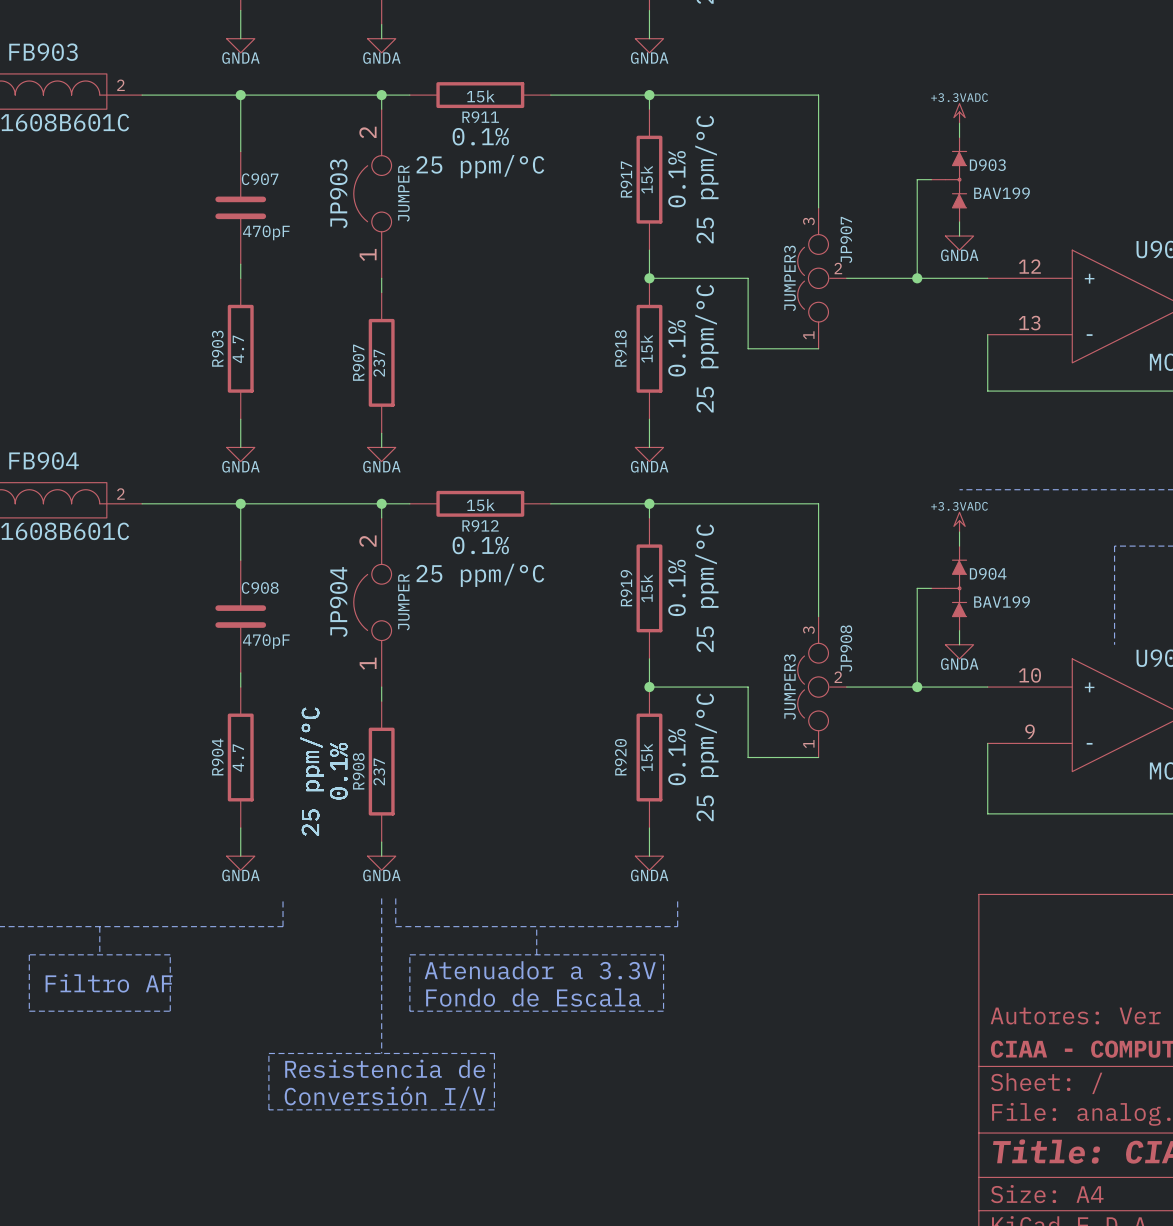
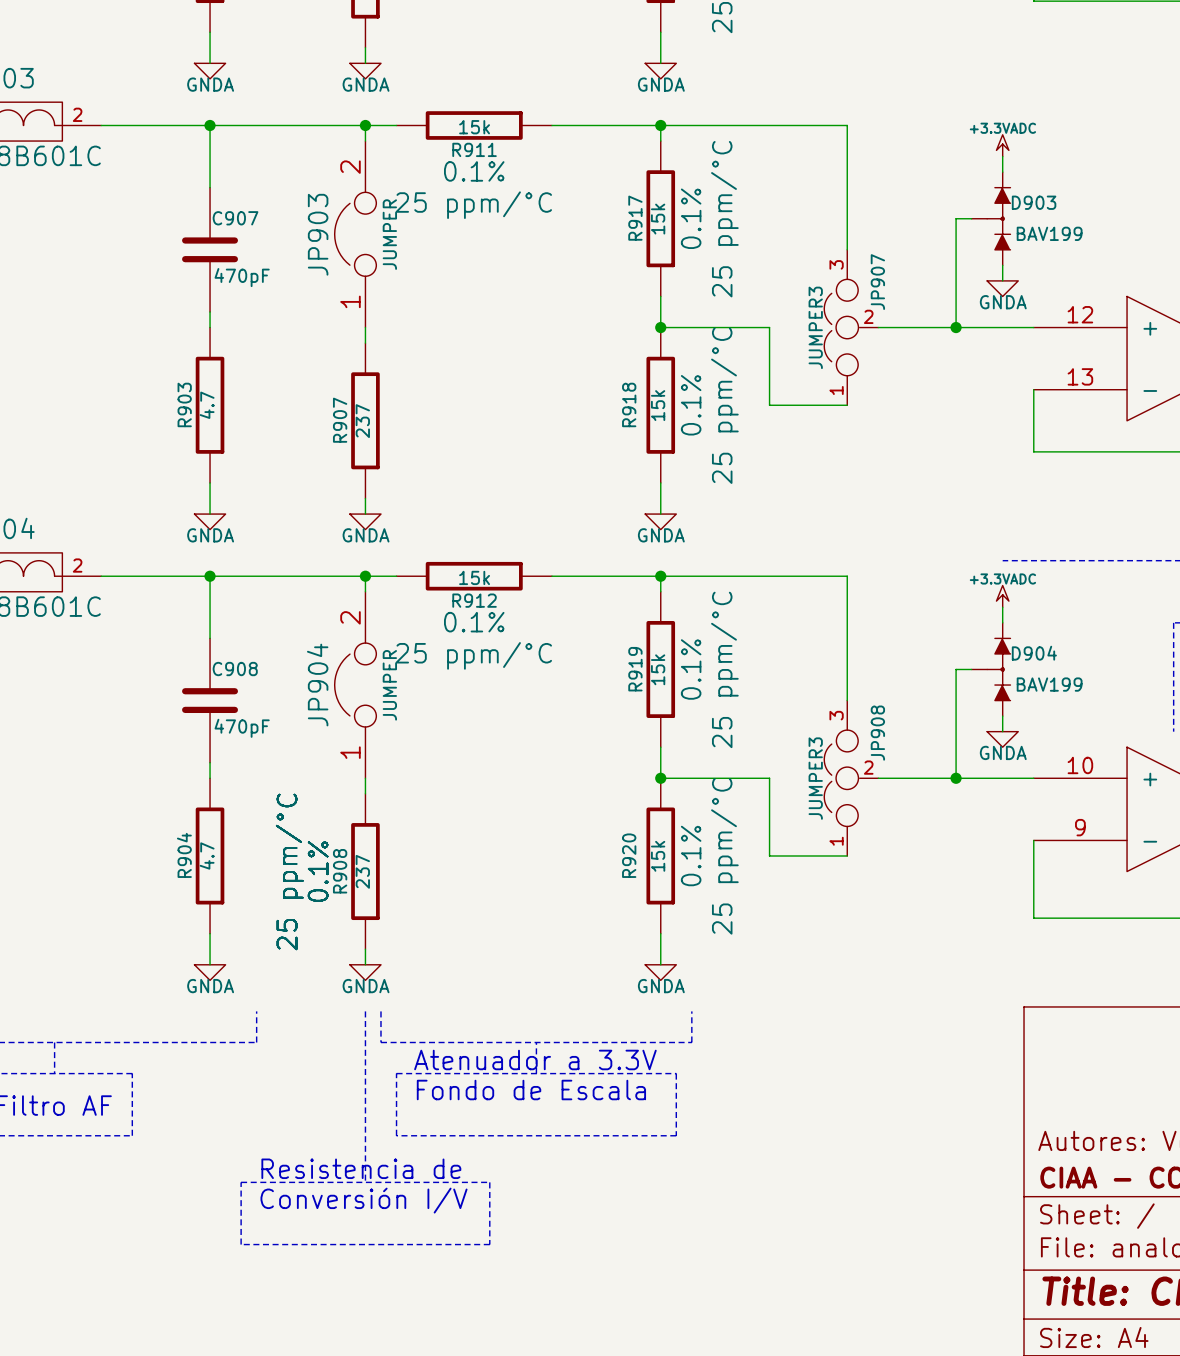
text: none -> Atenuador a 3.3V (535, 1059)
text: Atenuador a 3.3V (540, 970) -> Fondo de Escala (531, 1090)
text: Fondo de Escala (533, 997) -> none
text: none -> Resistencia de (361, 1168)
text: Resistencia de (385, 1068) -> Conversión I/V (364, 1200)
text: Conversión I/V (385, 1097) -> none

